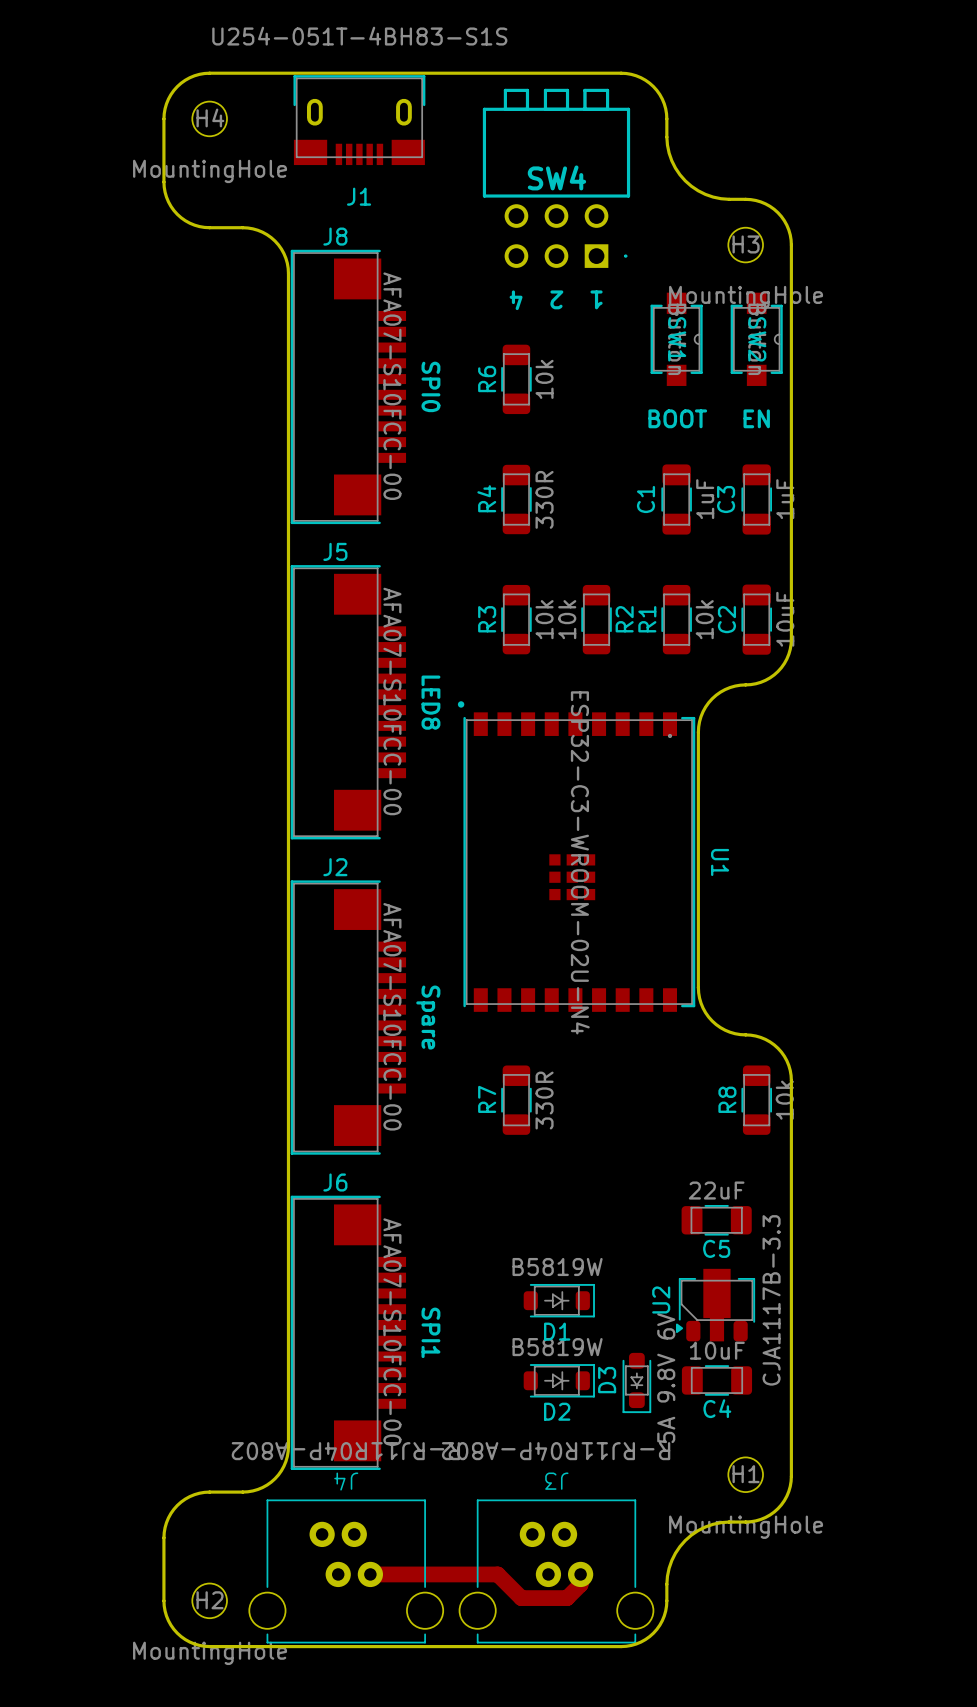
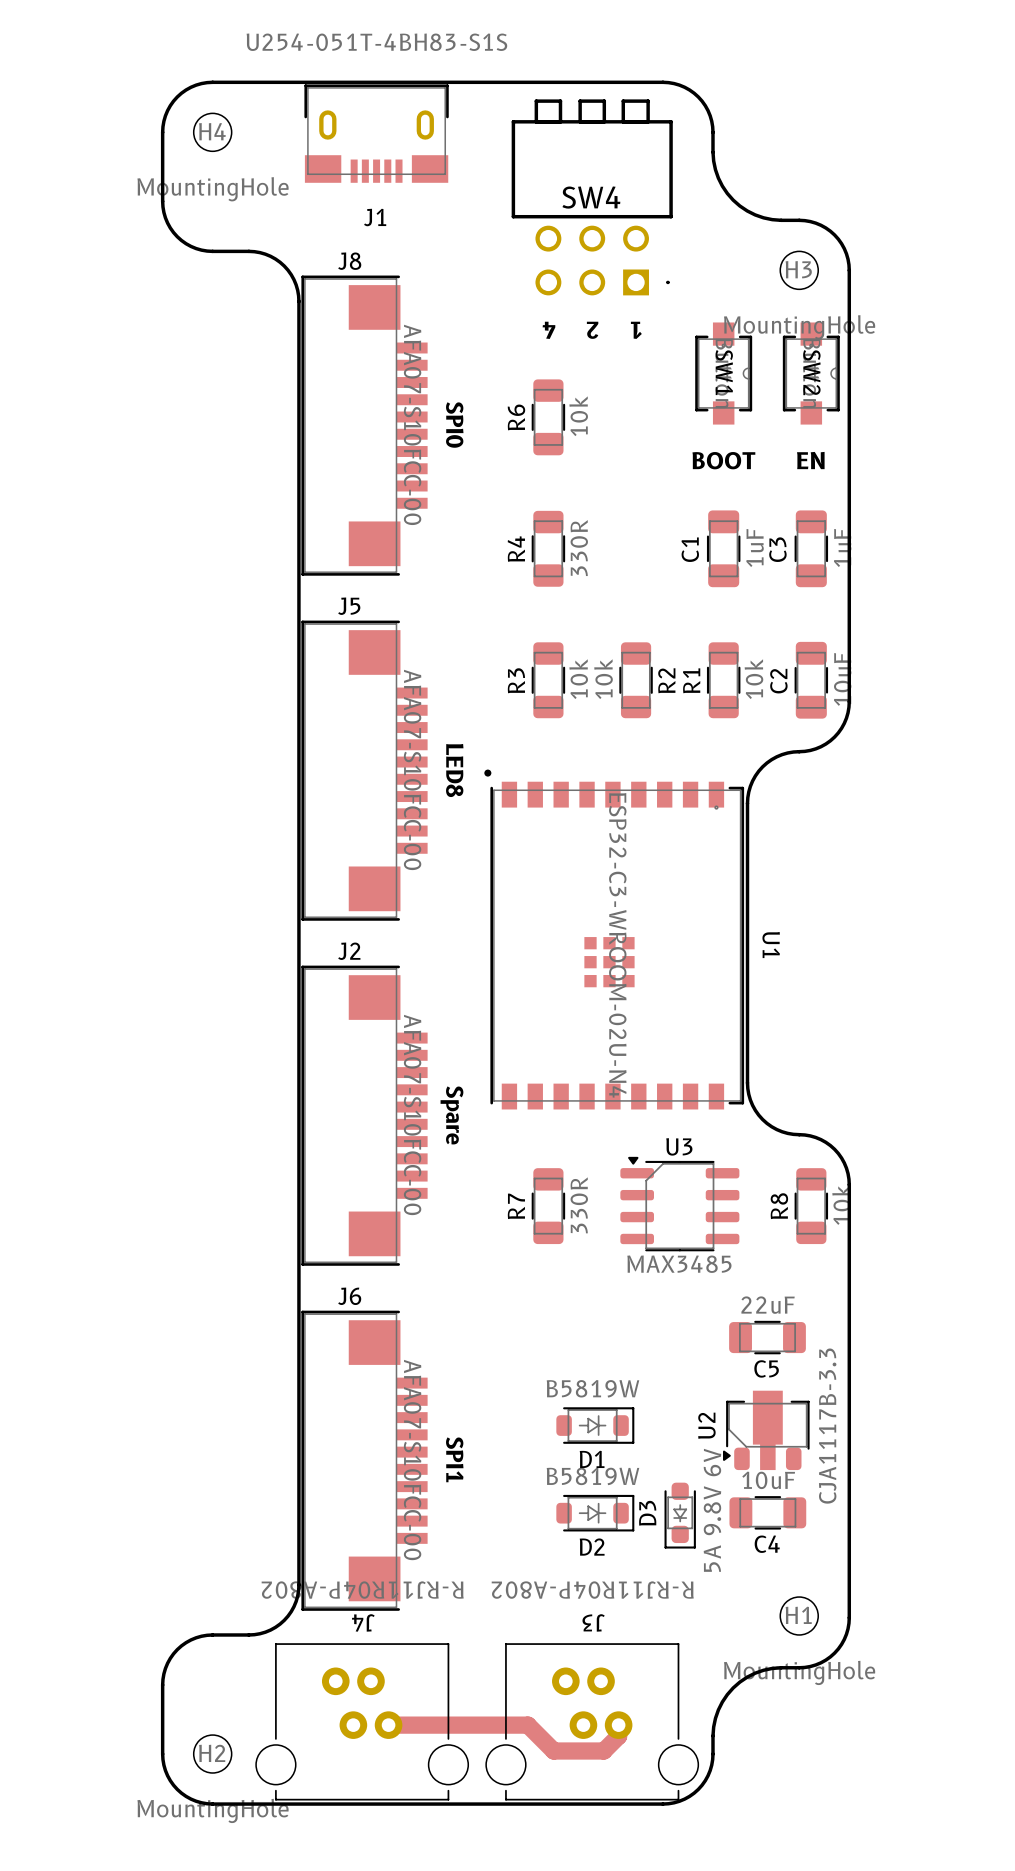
U3: none -> MAX3485 (679, 1204)

